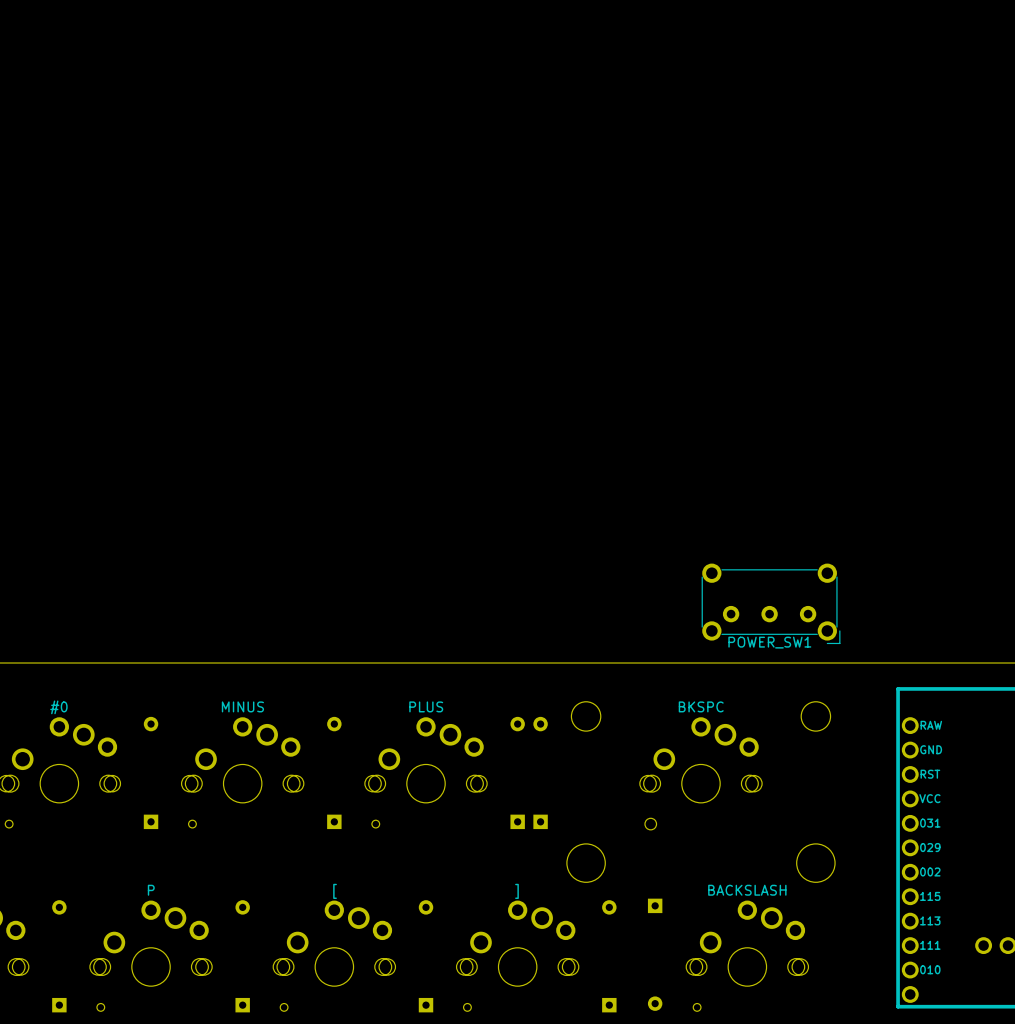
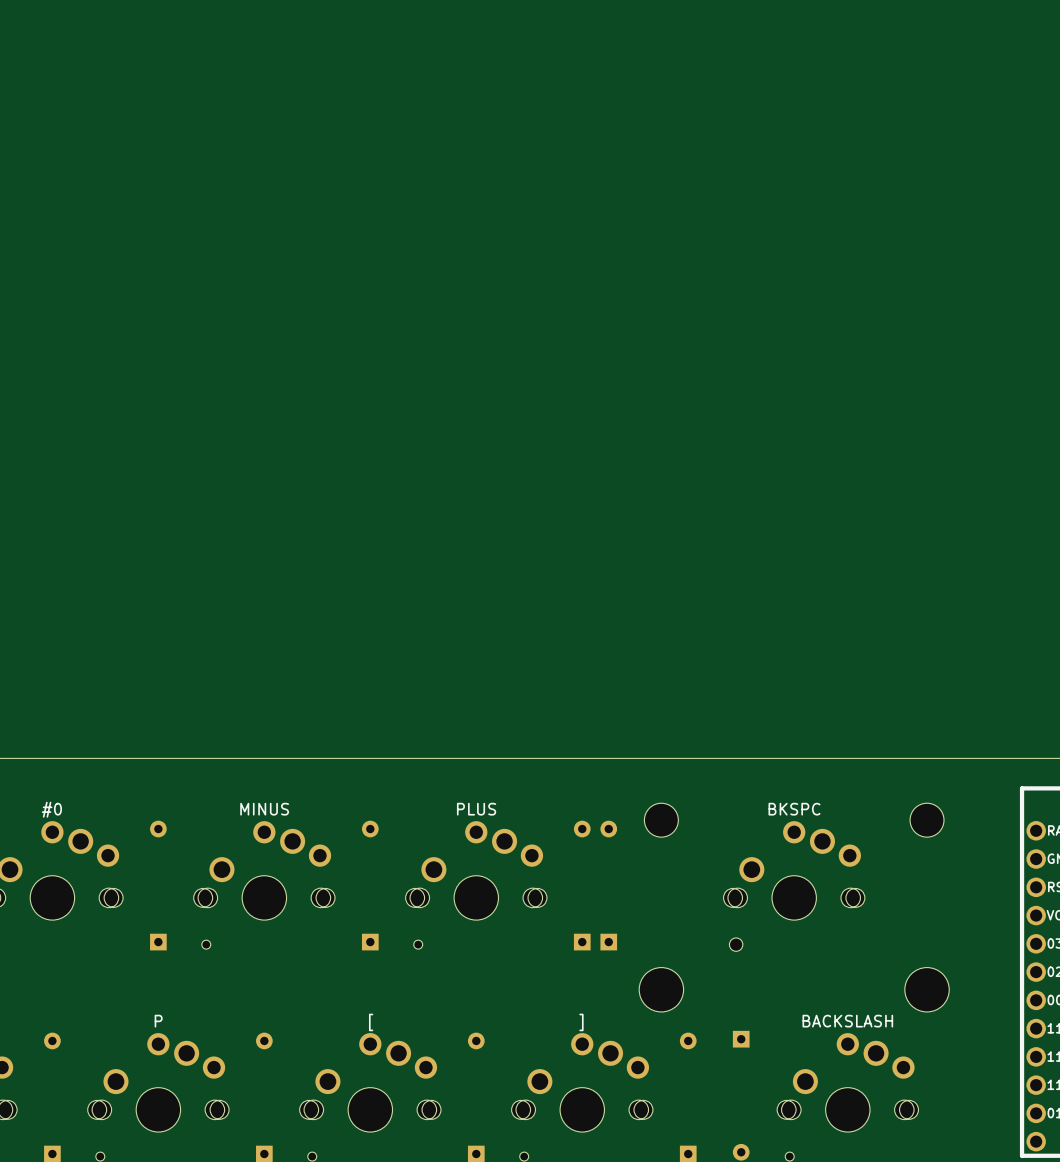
POWER_SW1: (771, 603) -> none

